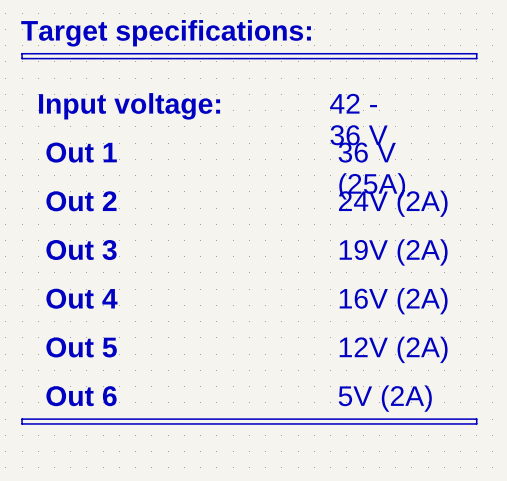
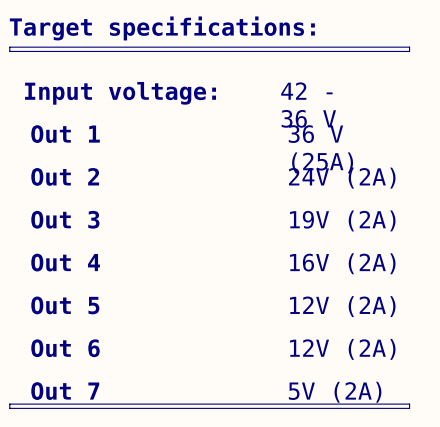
text: 5V (2A) (385, 398) -> 12V (2A) (342, 349)
line: (22, 419) (476, 419) (476, 423) (22, 423) (22, 419) -> (9, 404) (409, 404) (409, 408) (9, 408) (9, 404)
text: none -> Out 7 (65, 391)
text: none -> 5V (2A) (335, 392)

